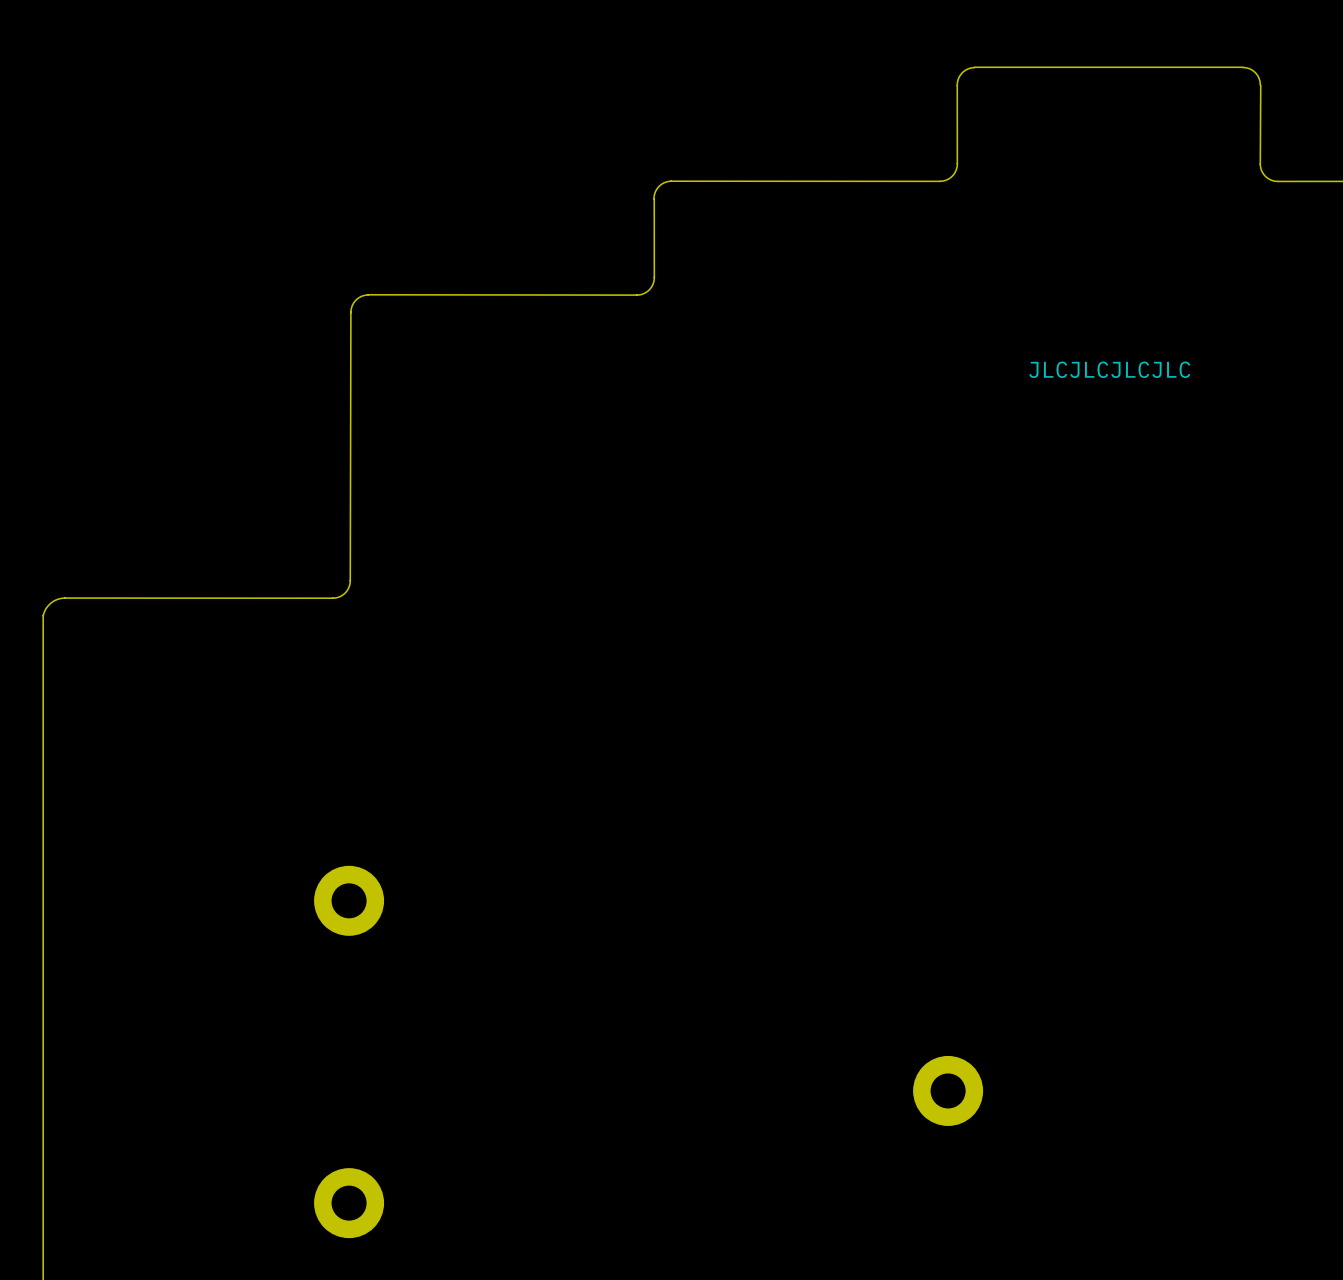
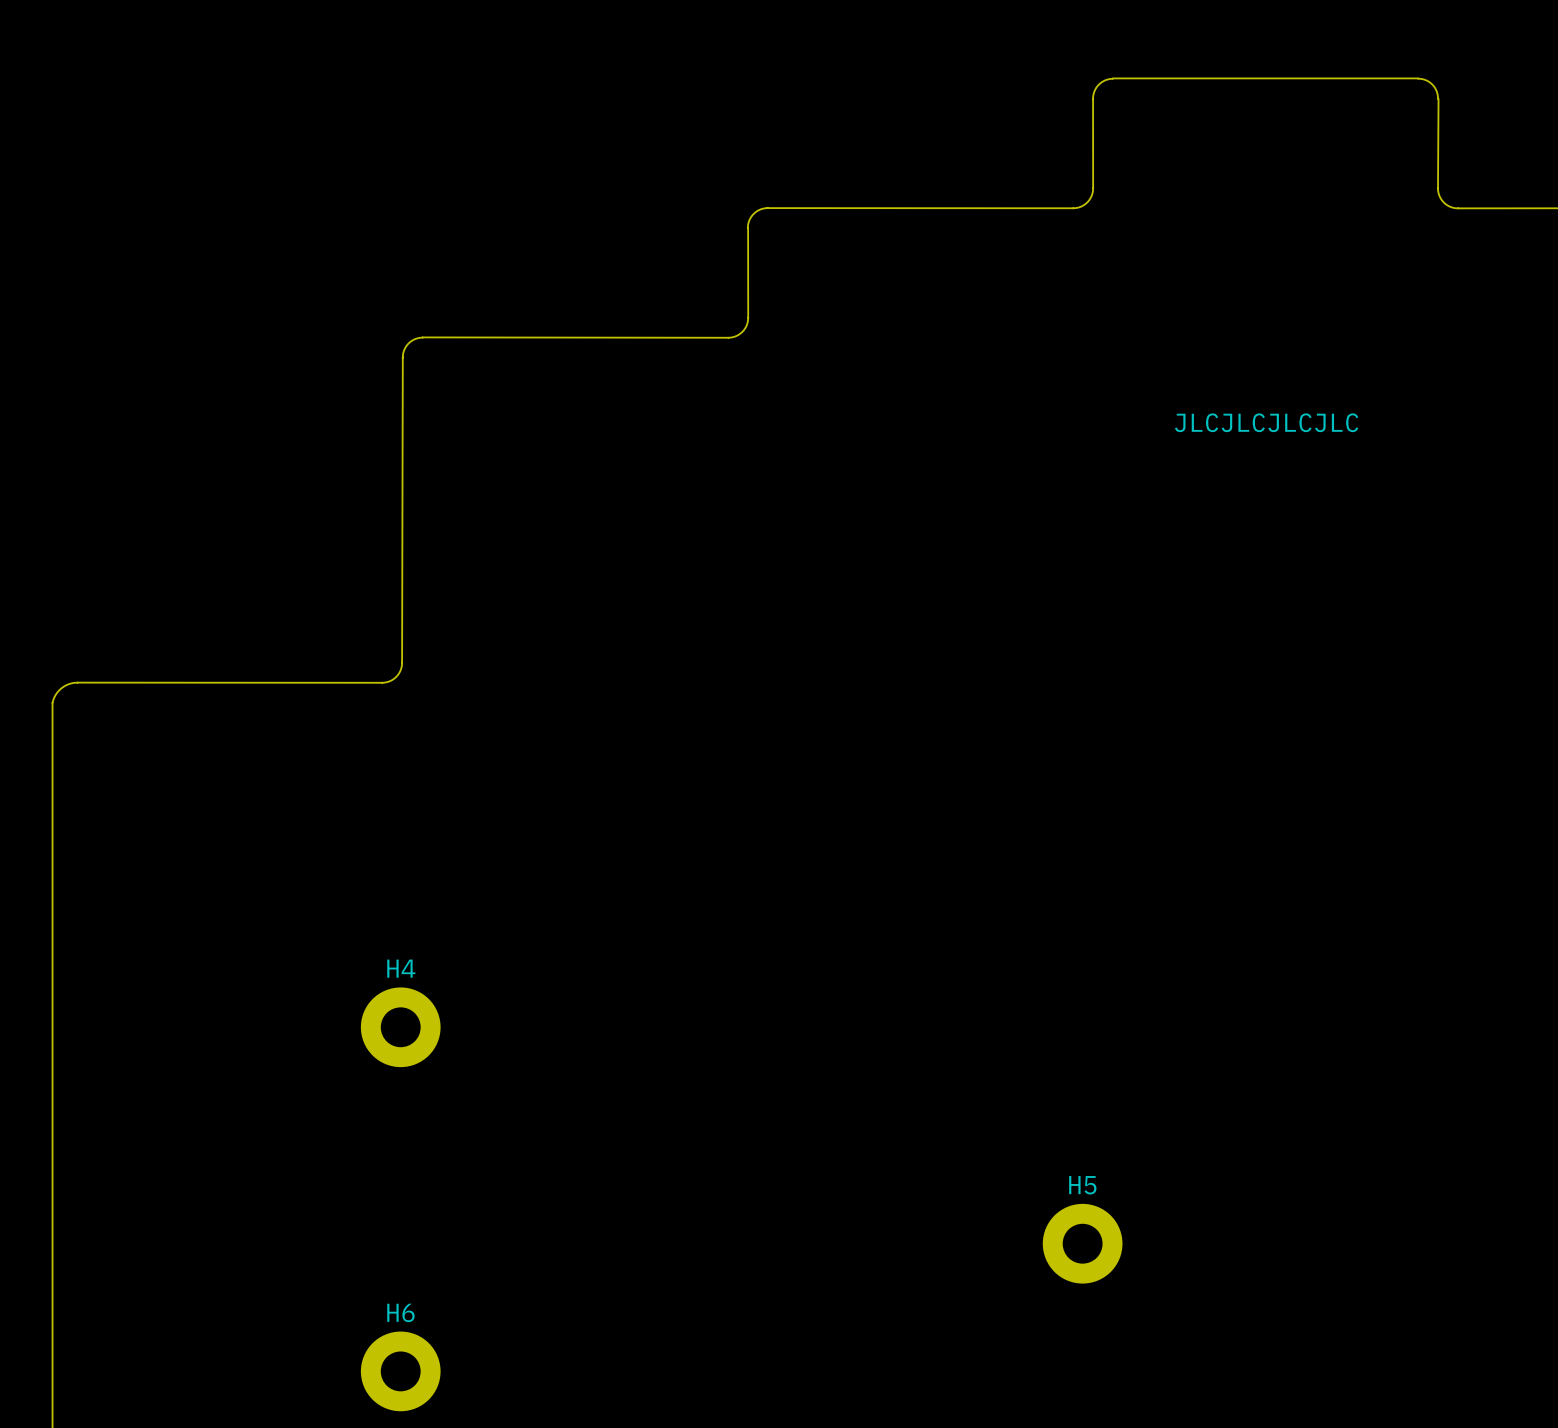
H4 name: none -> H4 (401, 968)
H5 name: none -> H5 (1082, 1185)
H6 name: none -> H6 (400, 1312)

